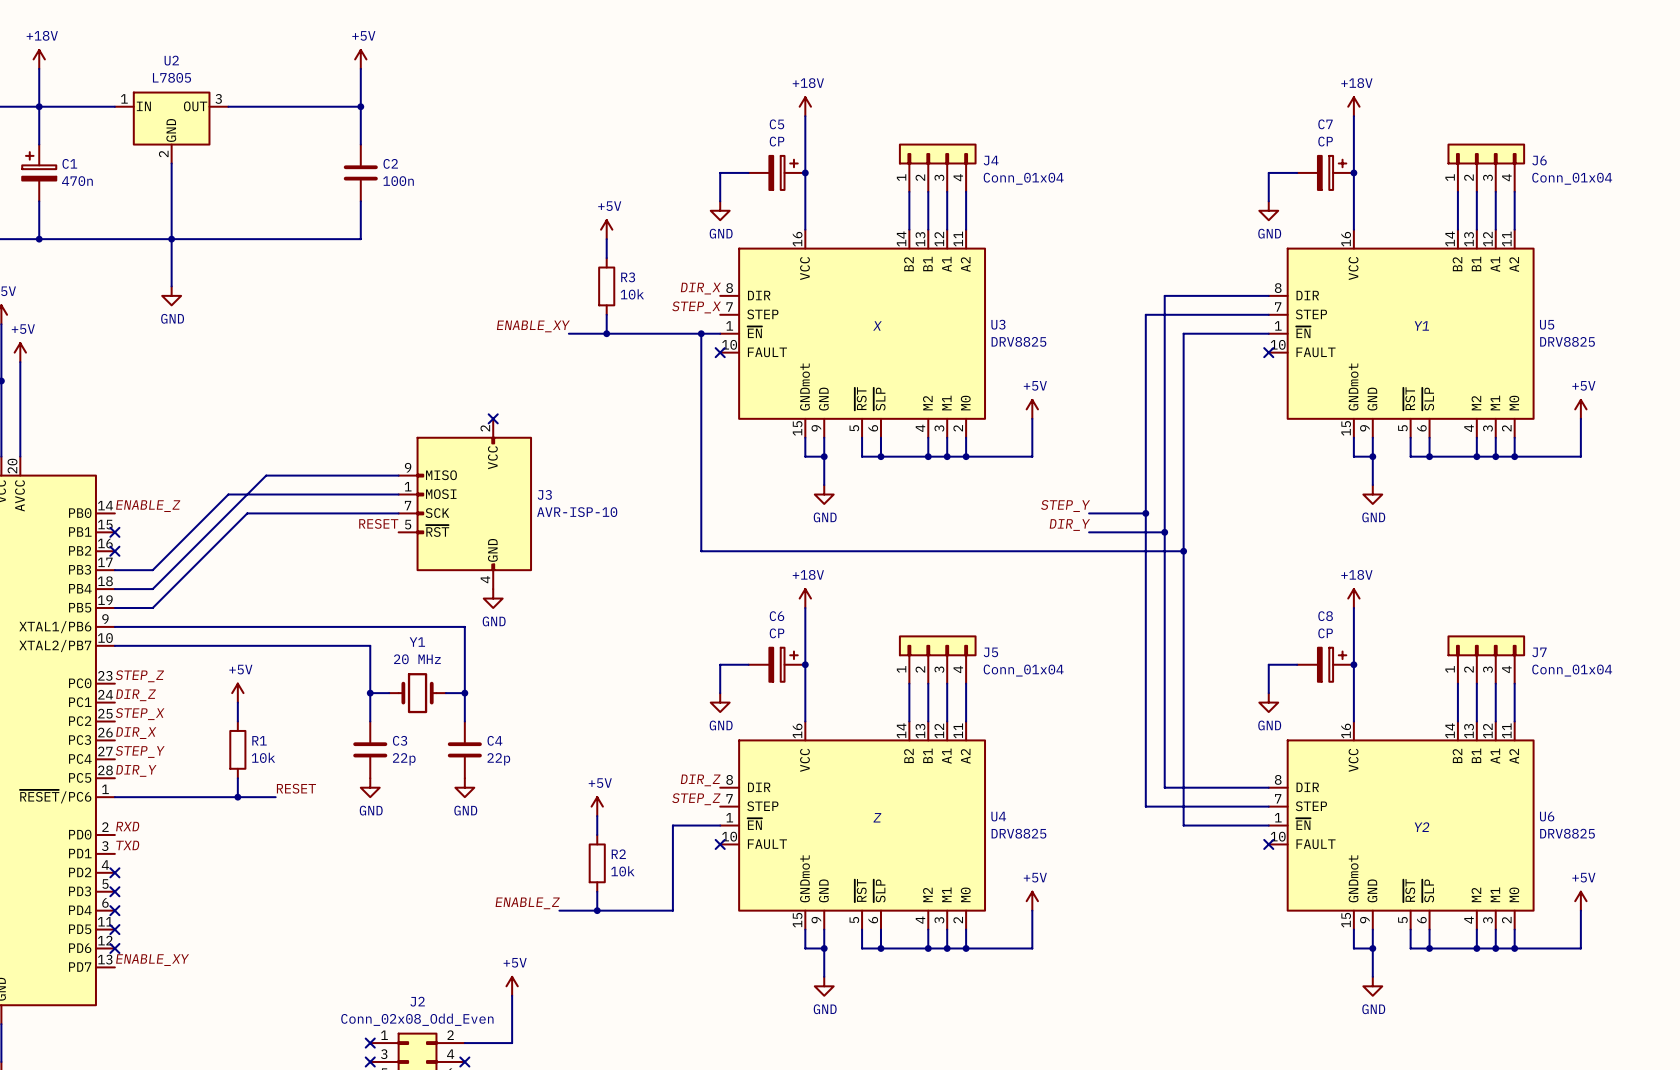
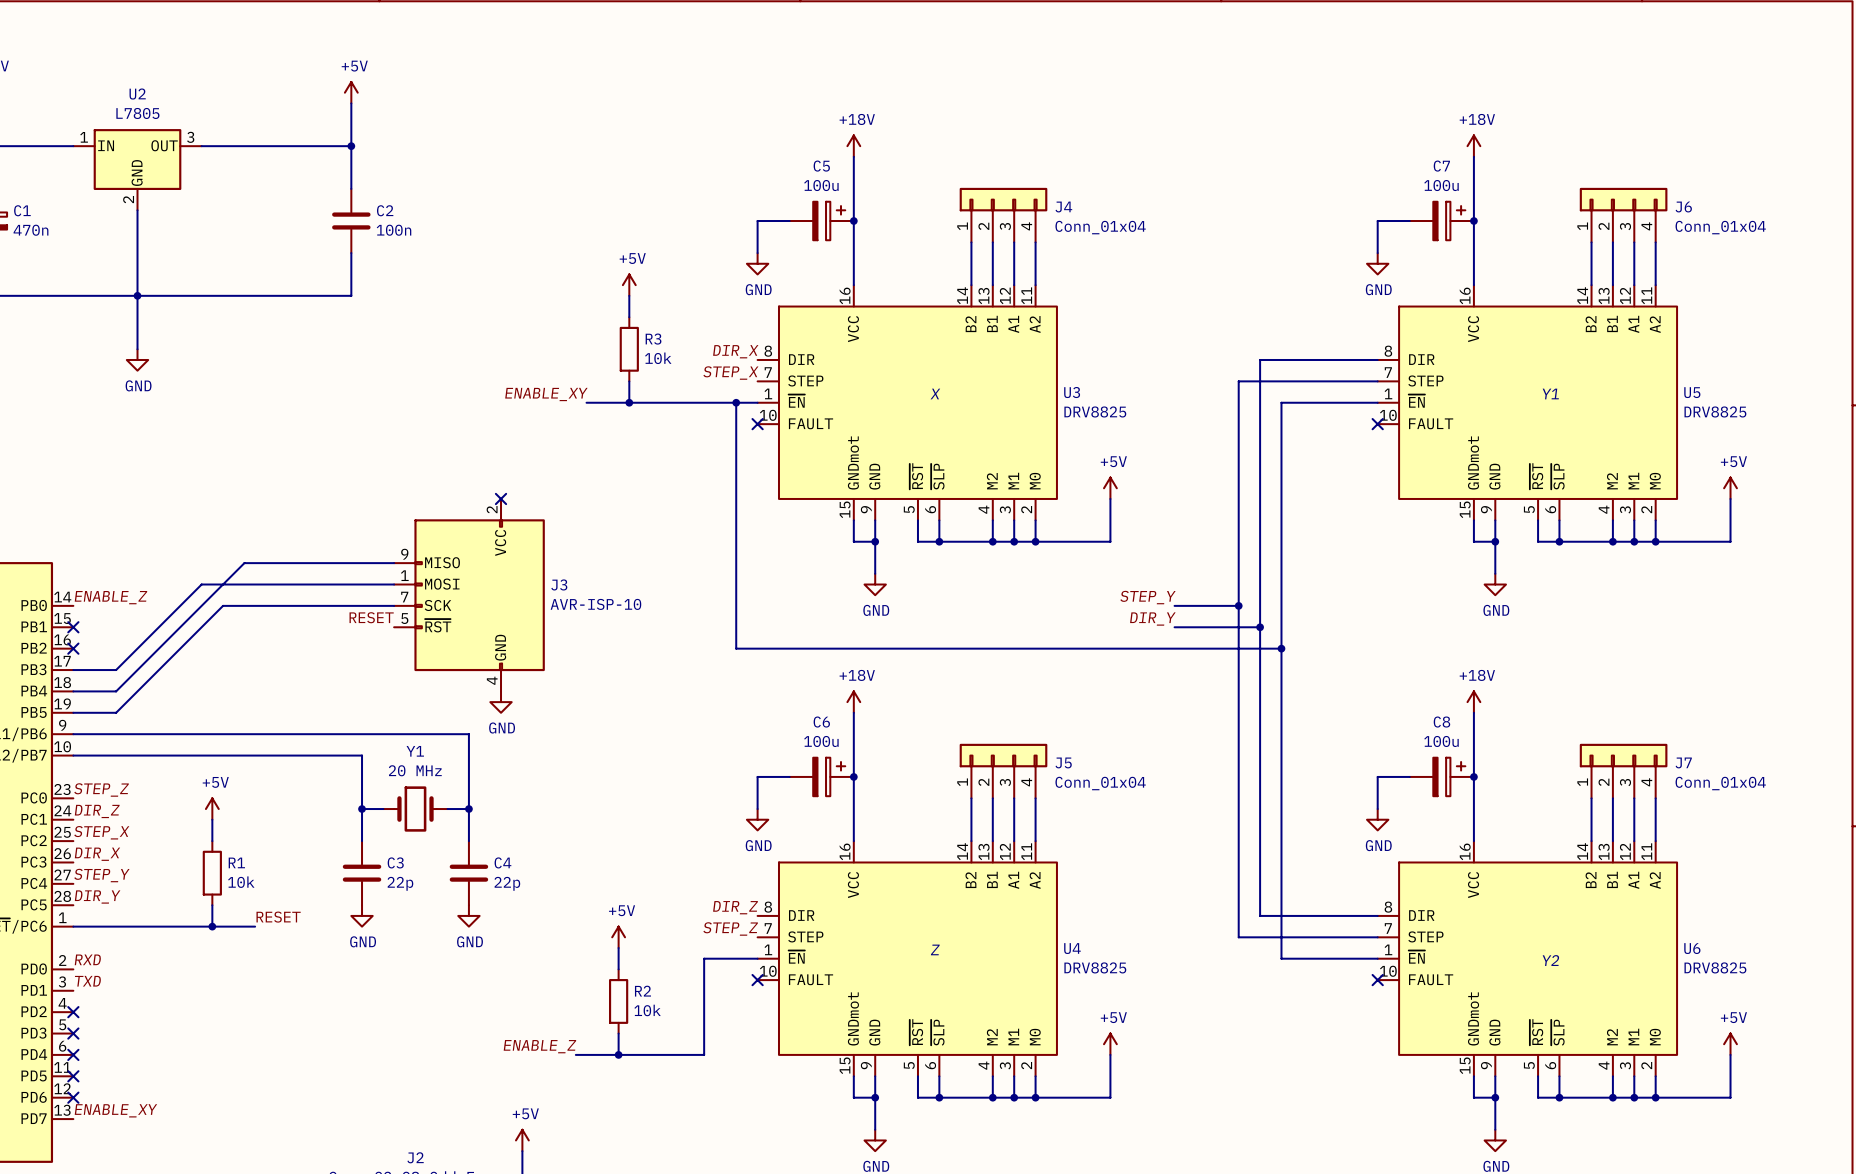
C5 value: CP (777, 141) -> 100u (821, 185)
C7 value: CP (1325, 141) -> 100u (1441, 185)
C6 value: CP (777, 633) -> 100u (821, 741)
C8 value: CP (1325, 633) -> 100u (1441, 741)

